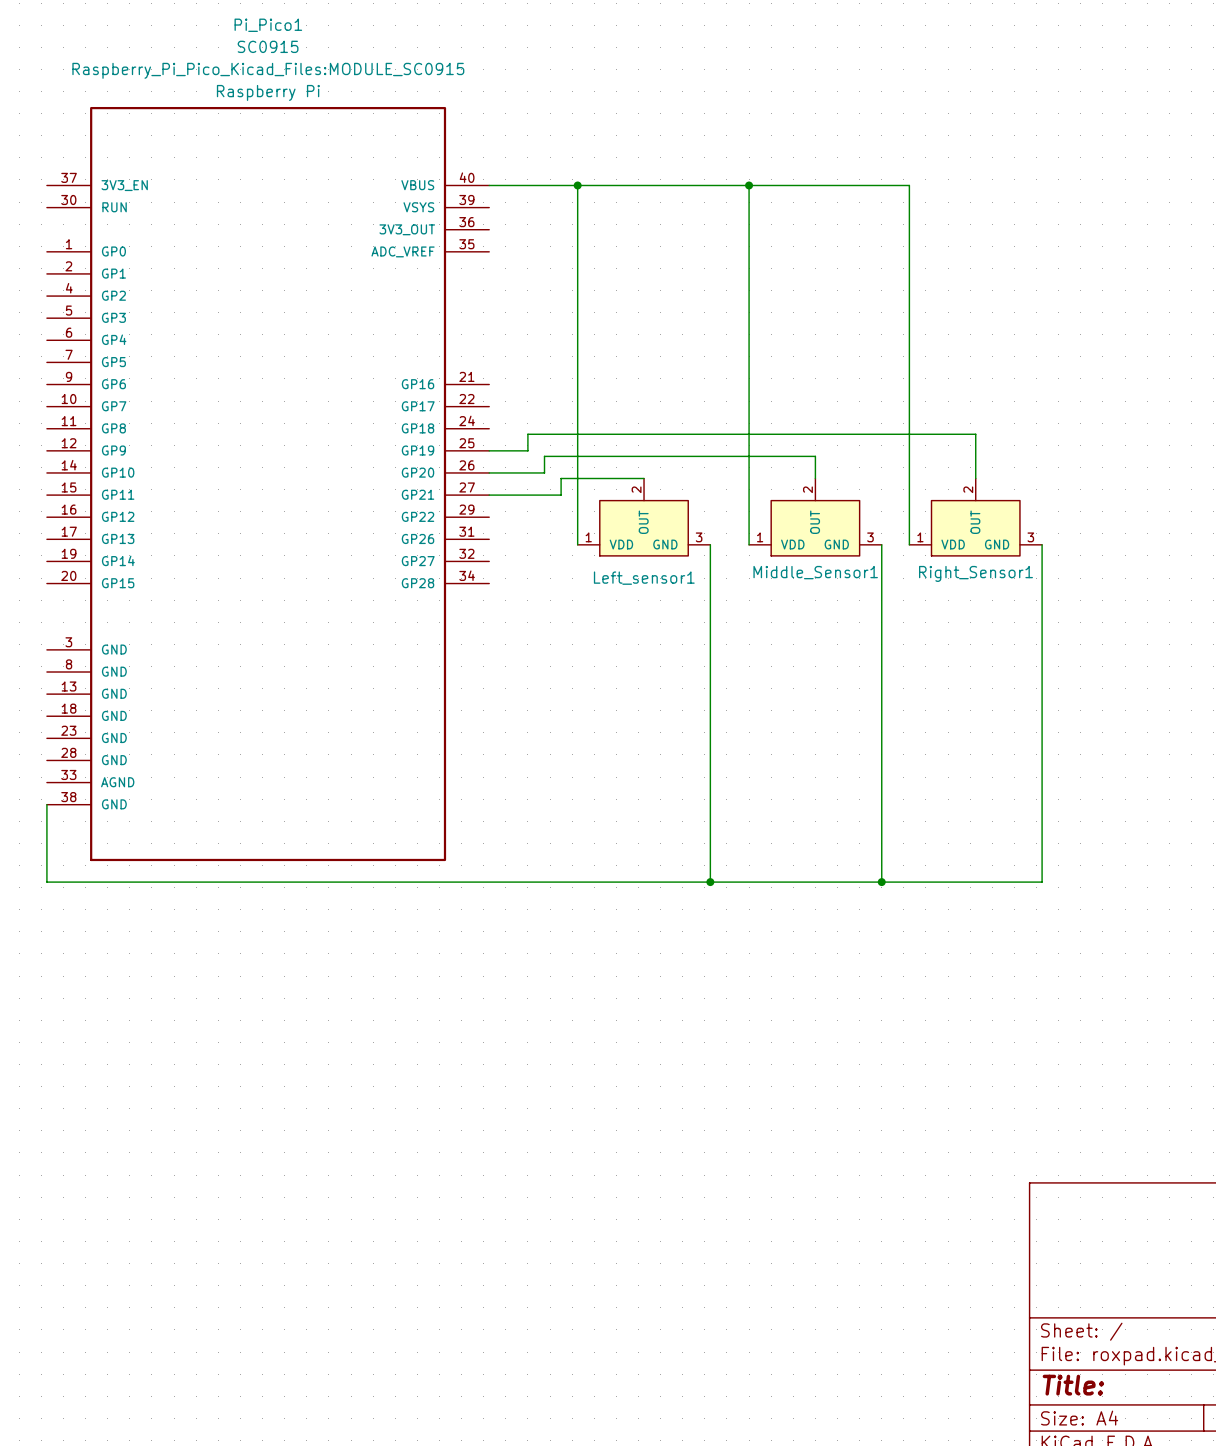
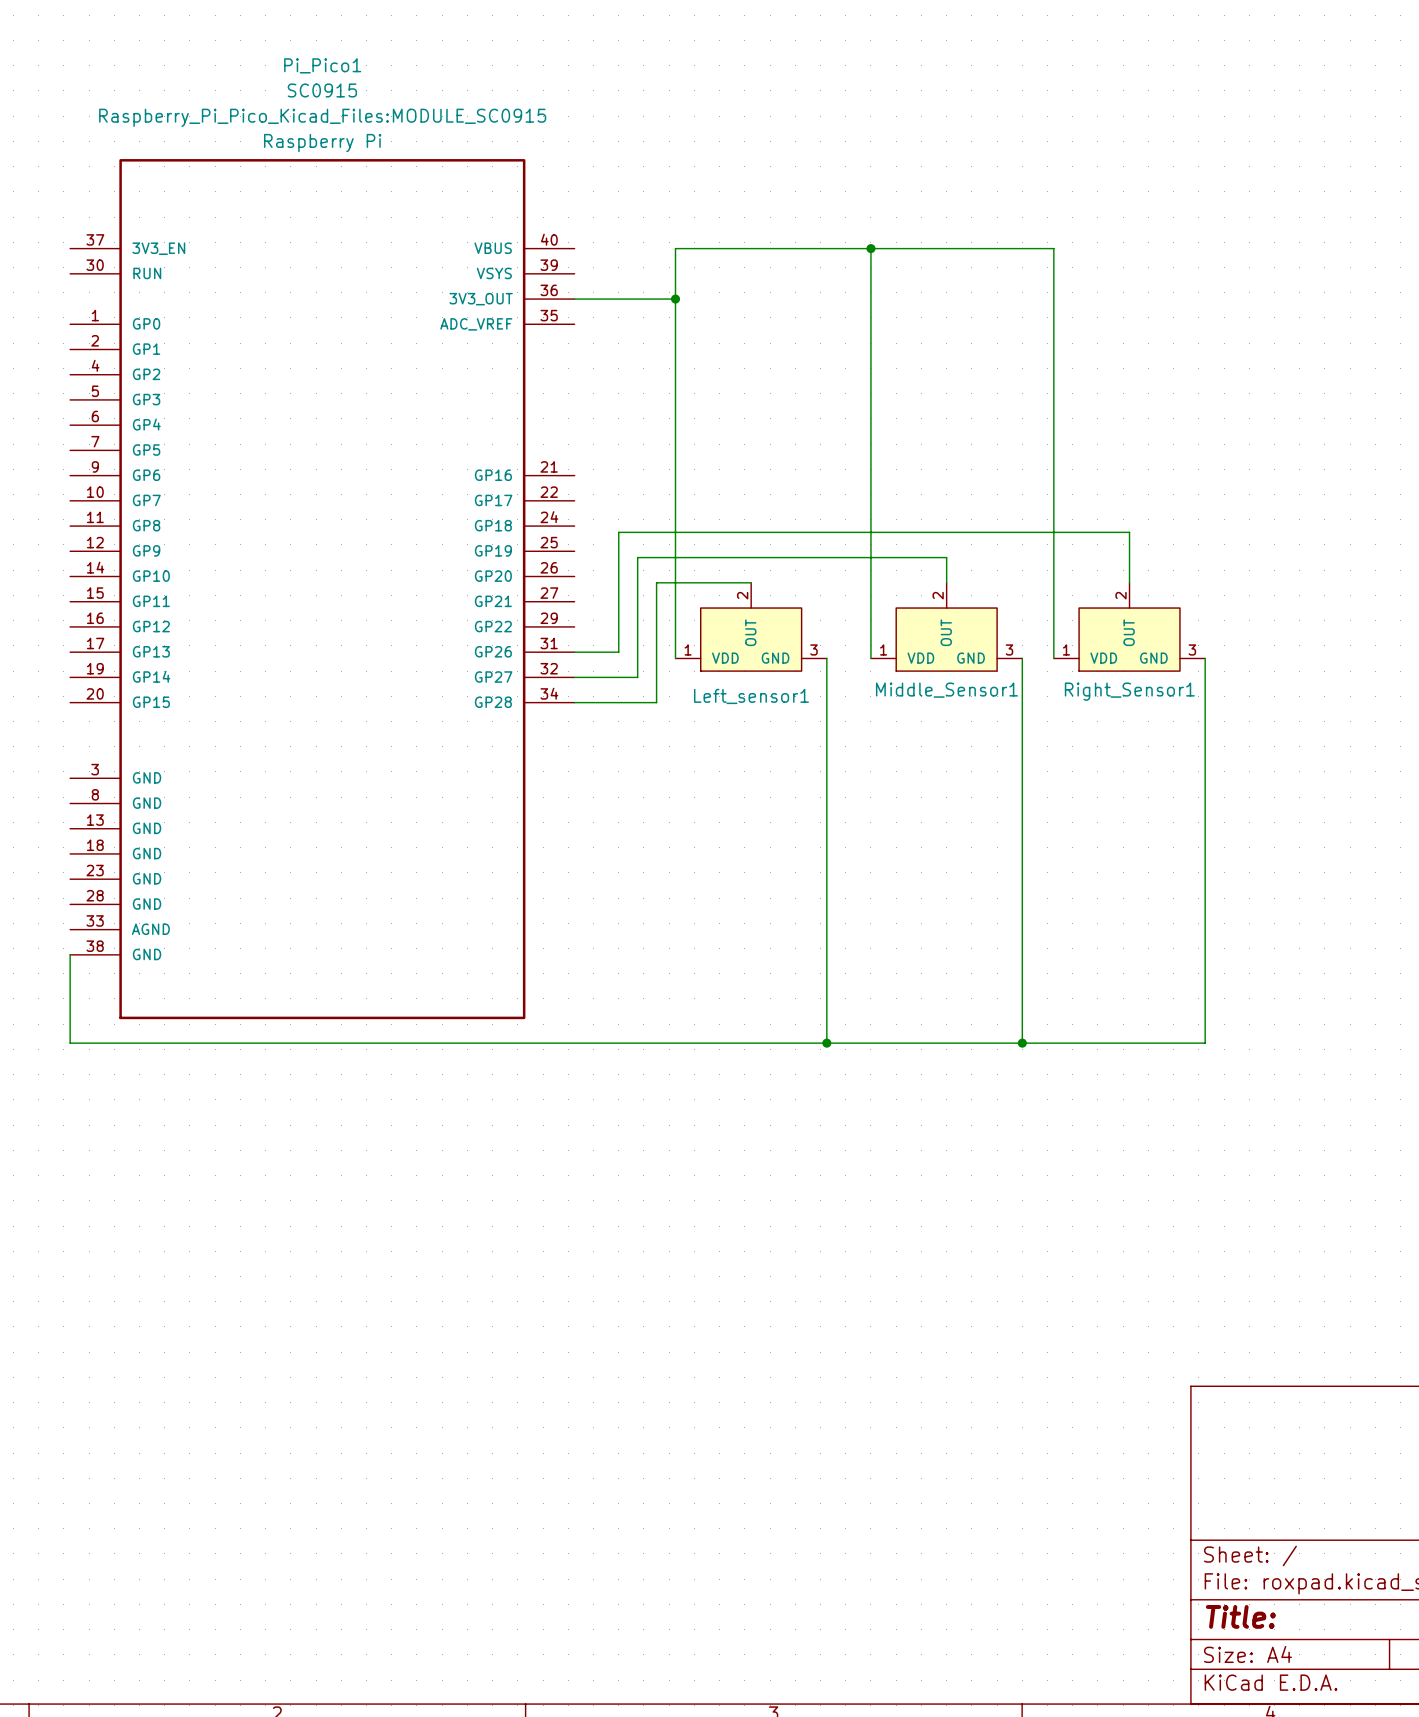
wire: (489, 185) (577, 185) -> (574, 299) (675, 299)
junction position: (577, 185) -> (675, 299)
wire: (489, 450) (527, 450) -> (574, 652) (618, 652) (618, 551)
wire: (489, 472) (544, 472) -> (574, 677) (637, 677) (637, 576)
wire: (489, 495) (561, 495) -> (574, 702) (656, 702) (656, 601)

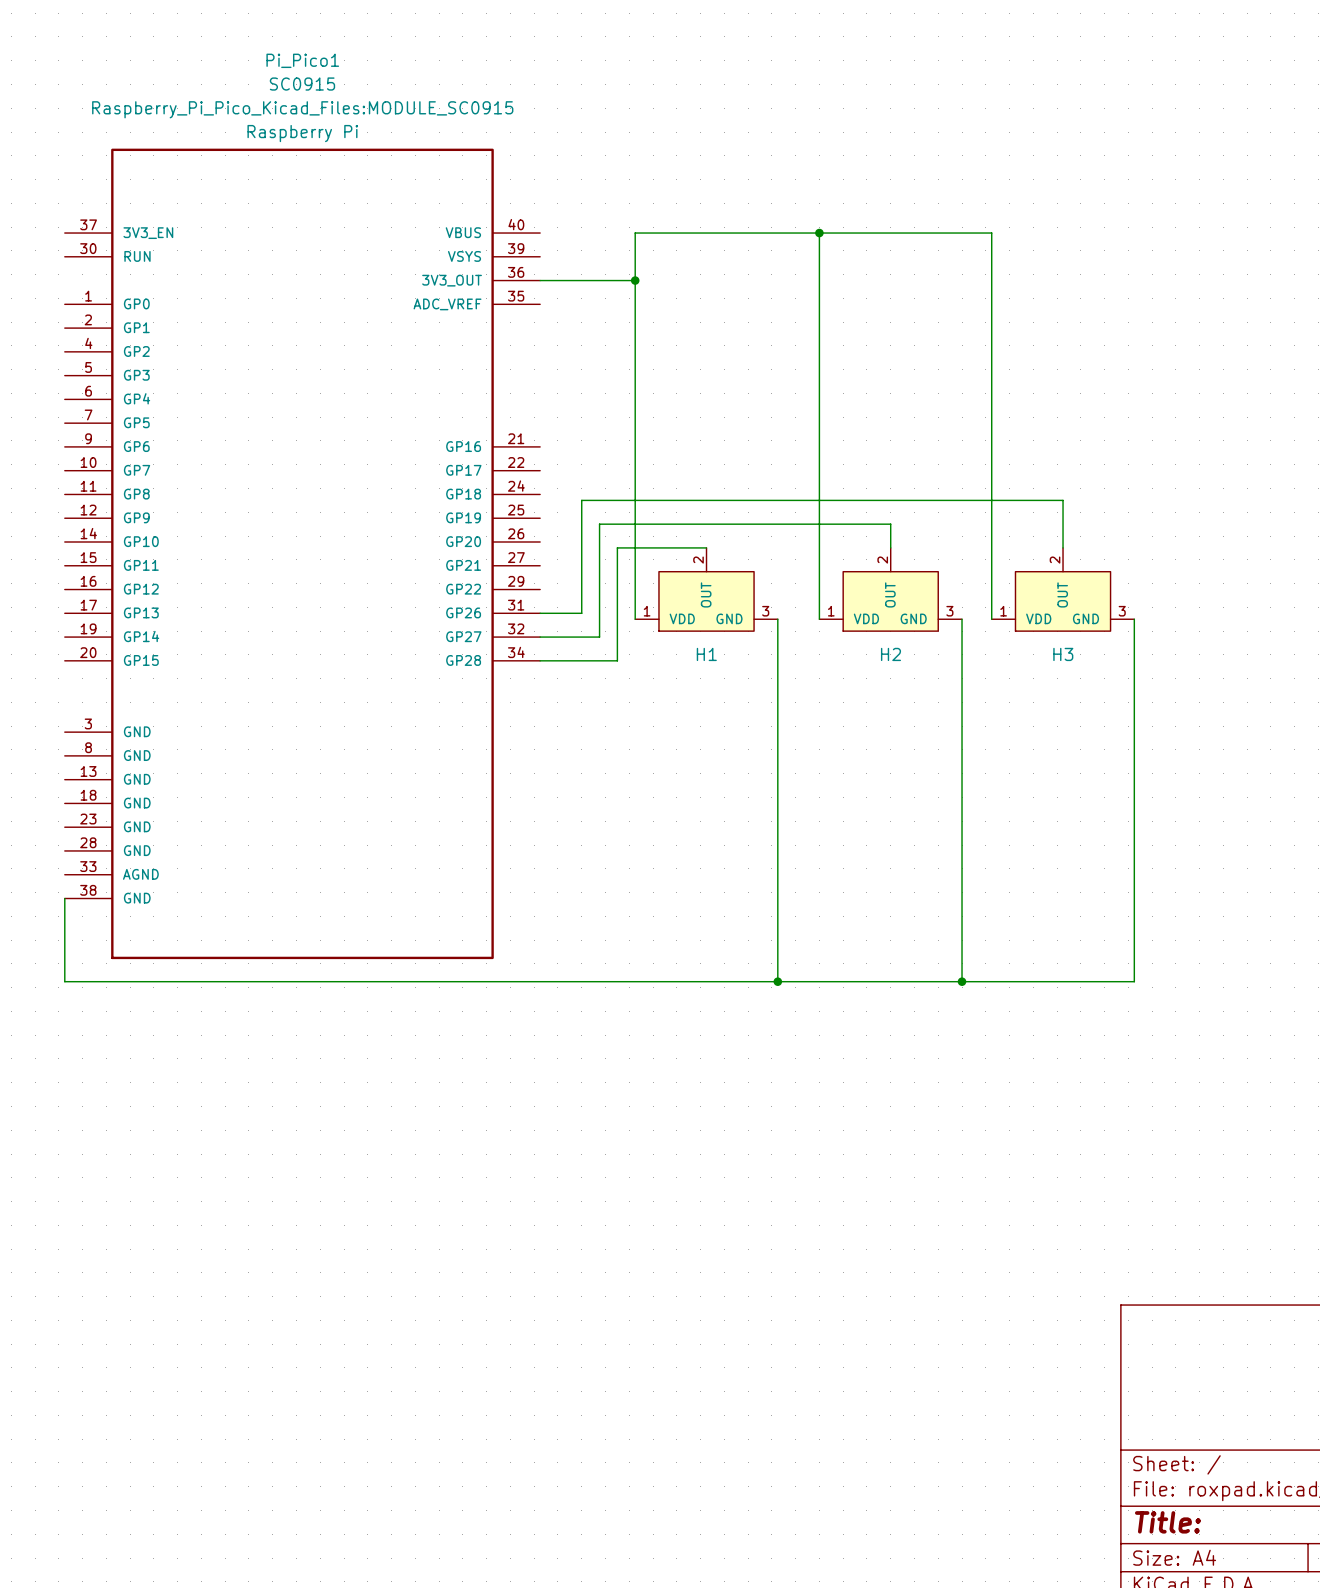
Middle_Sensor1 name: Middle_Sensor1 (946, 690) -> H2 (890, 654)
Right_Sensor1 name: Right_Sensor1 (1129, 691) -> H3 (1063, 654)
Left_sensor1 name: Left_sensor1 (751, 696) -> H1 (706, 654)

